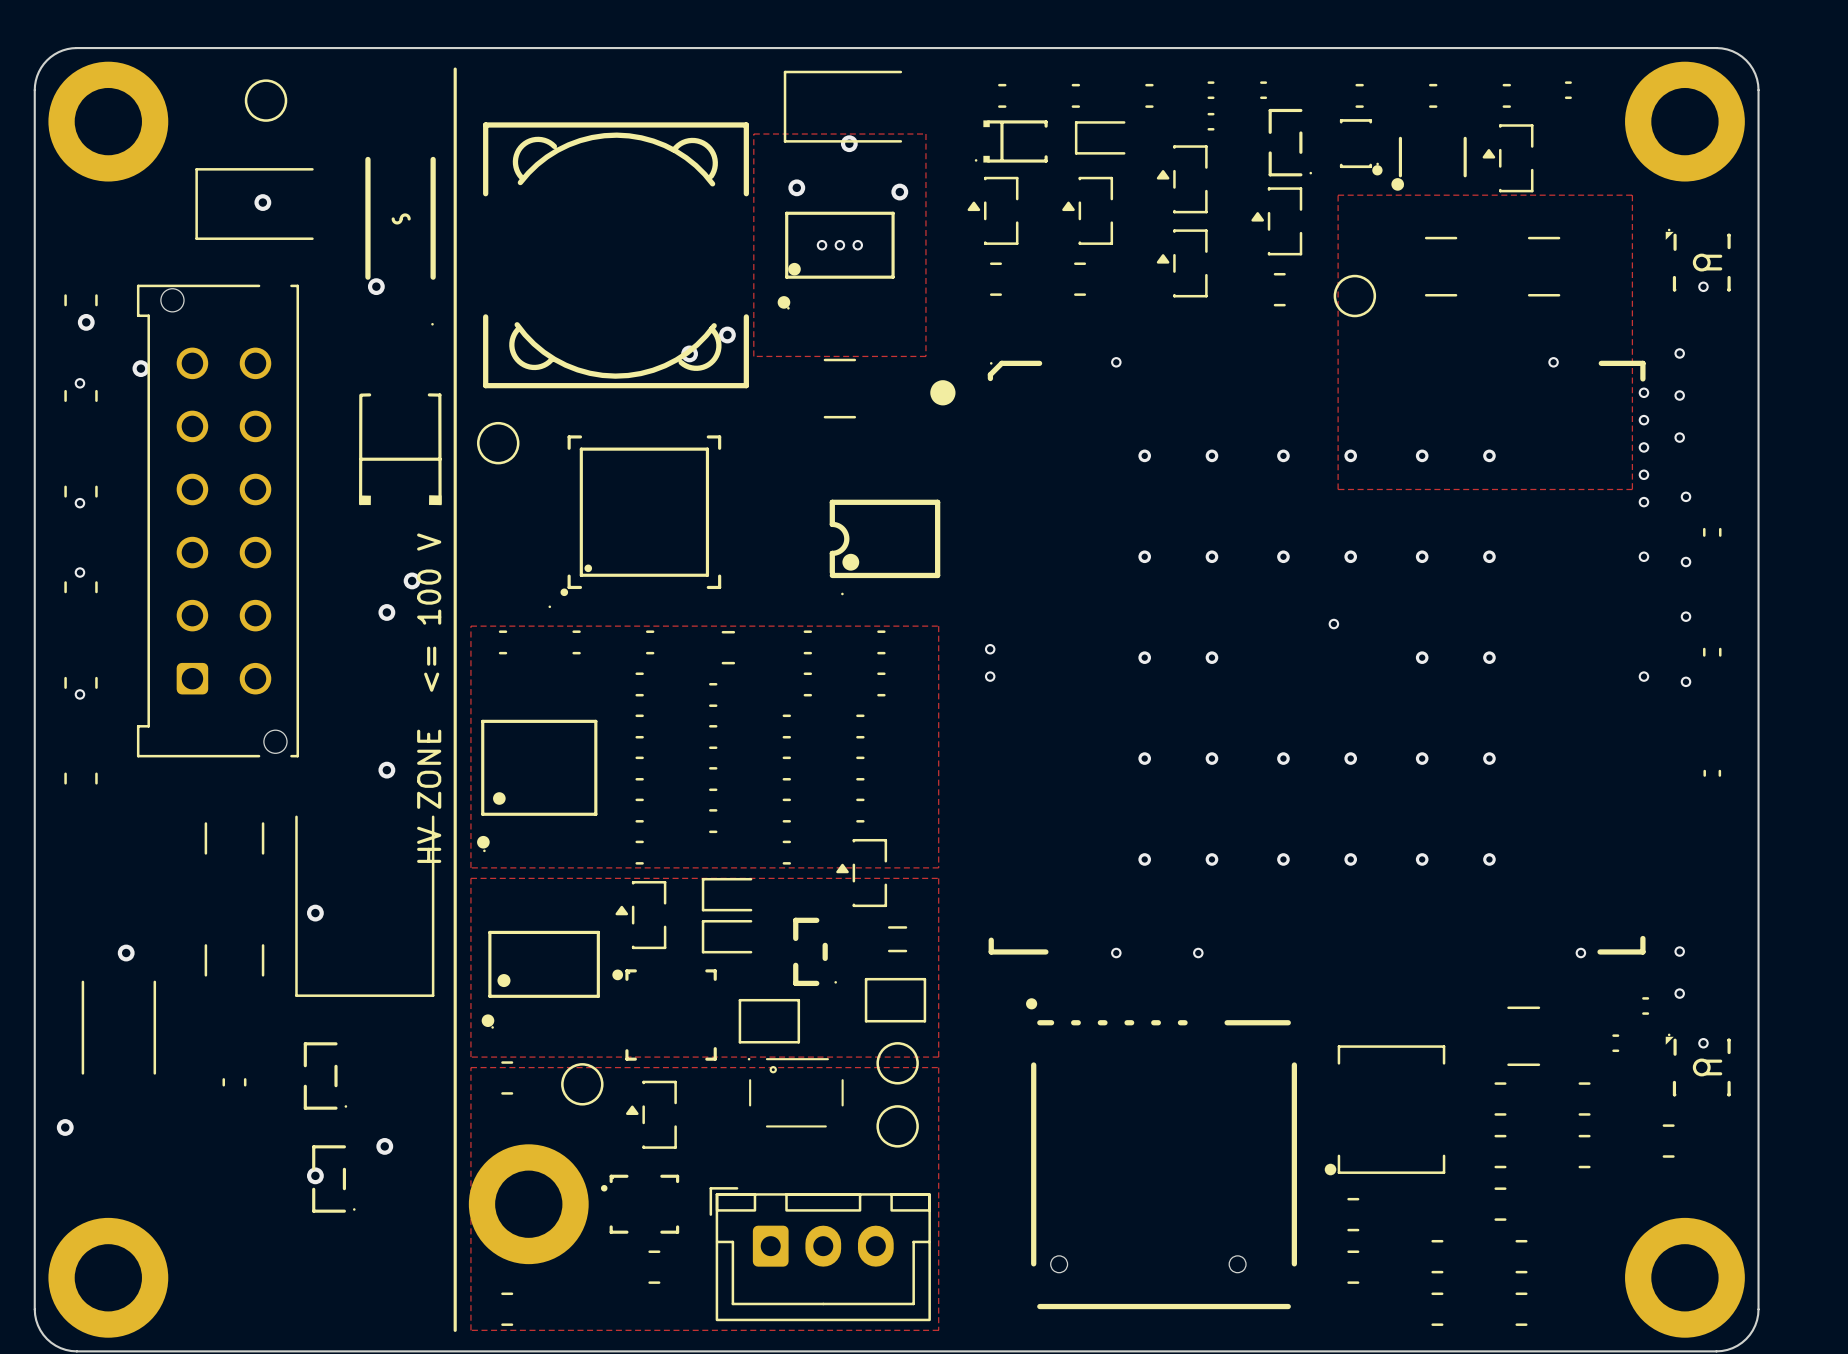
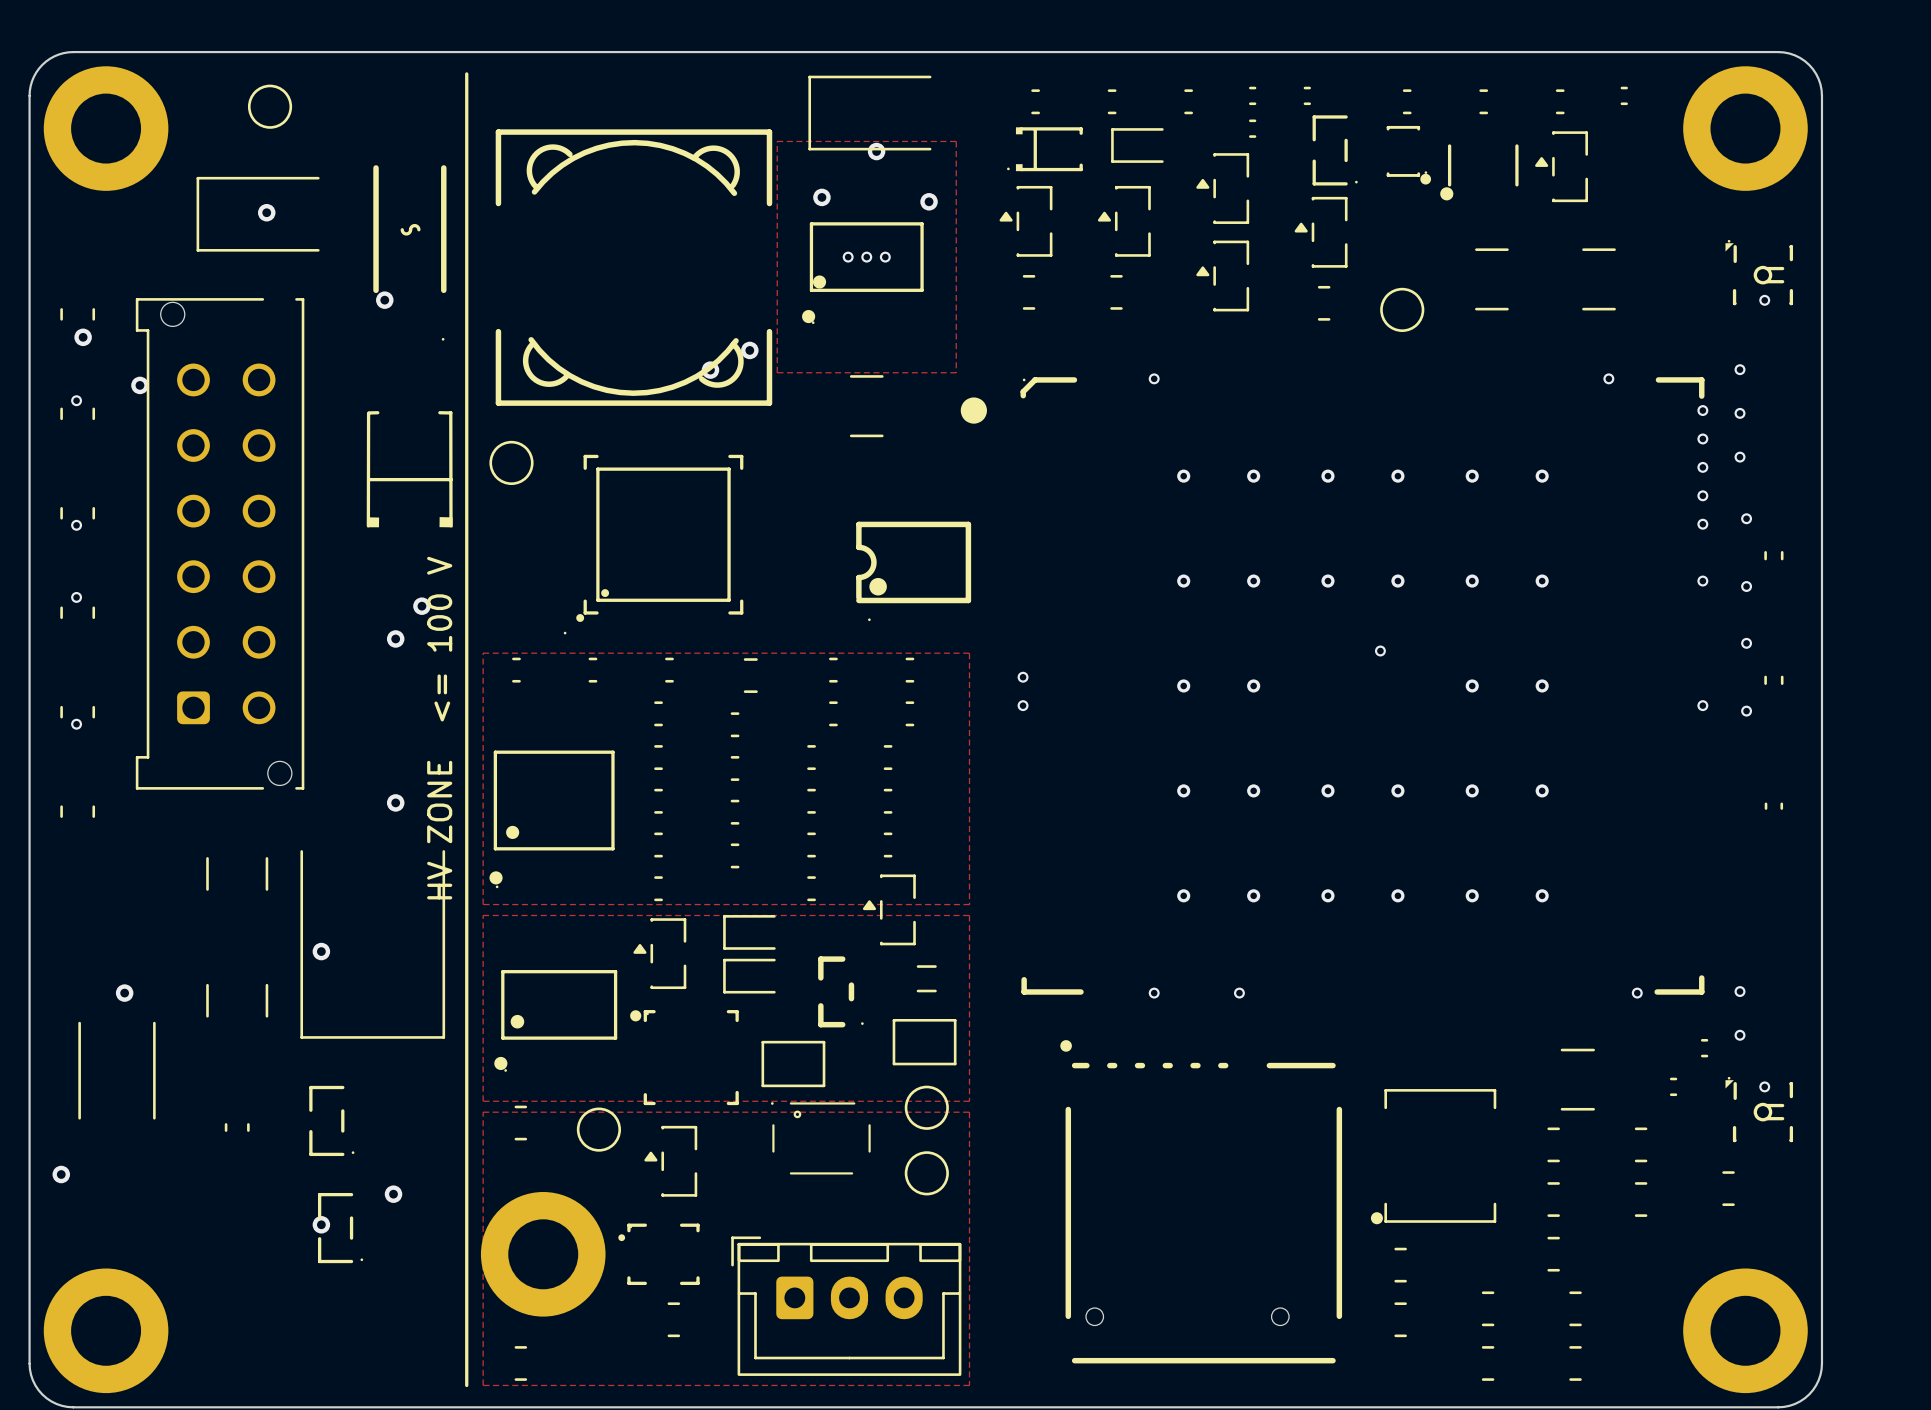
zone outline: (1338, 195) (1632, 195) (1632, 489) (1338, 489) (1338, 195) -> none

